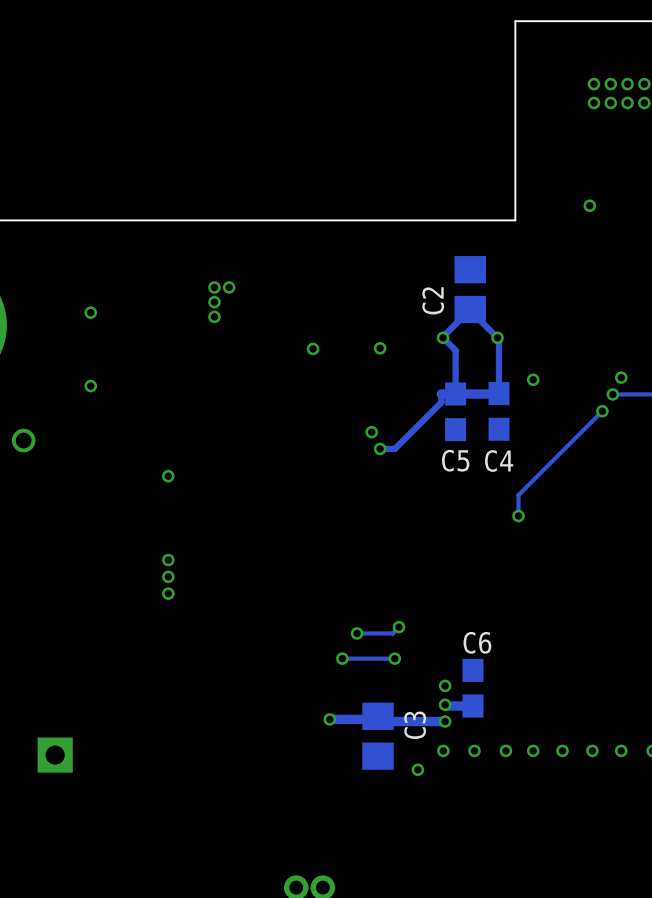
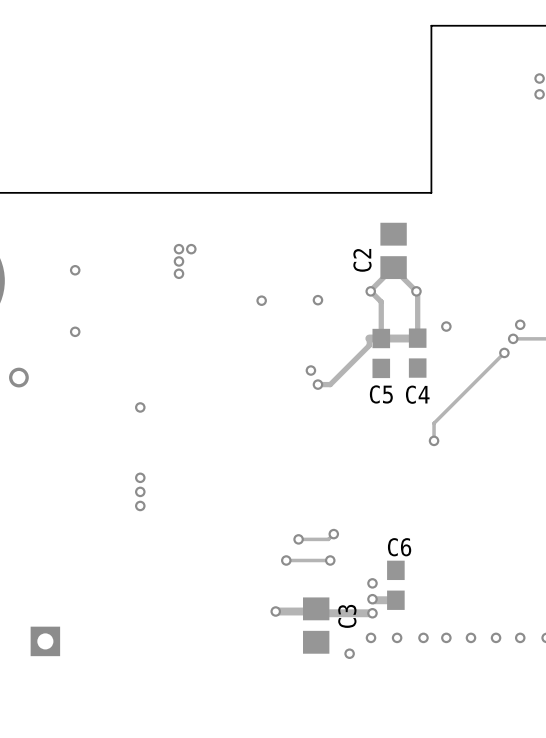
via: (593, 84) -> none
via: (610, 84) -> none
via: (627, 84) -> none
via: (593, 102) -> none
via: (610, 102) -> none
via: (627, 102) -> none
via: (589, 205) -> none

